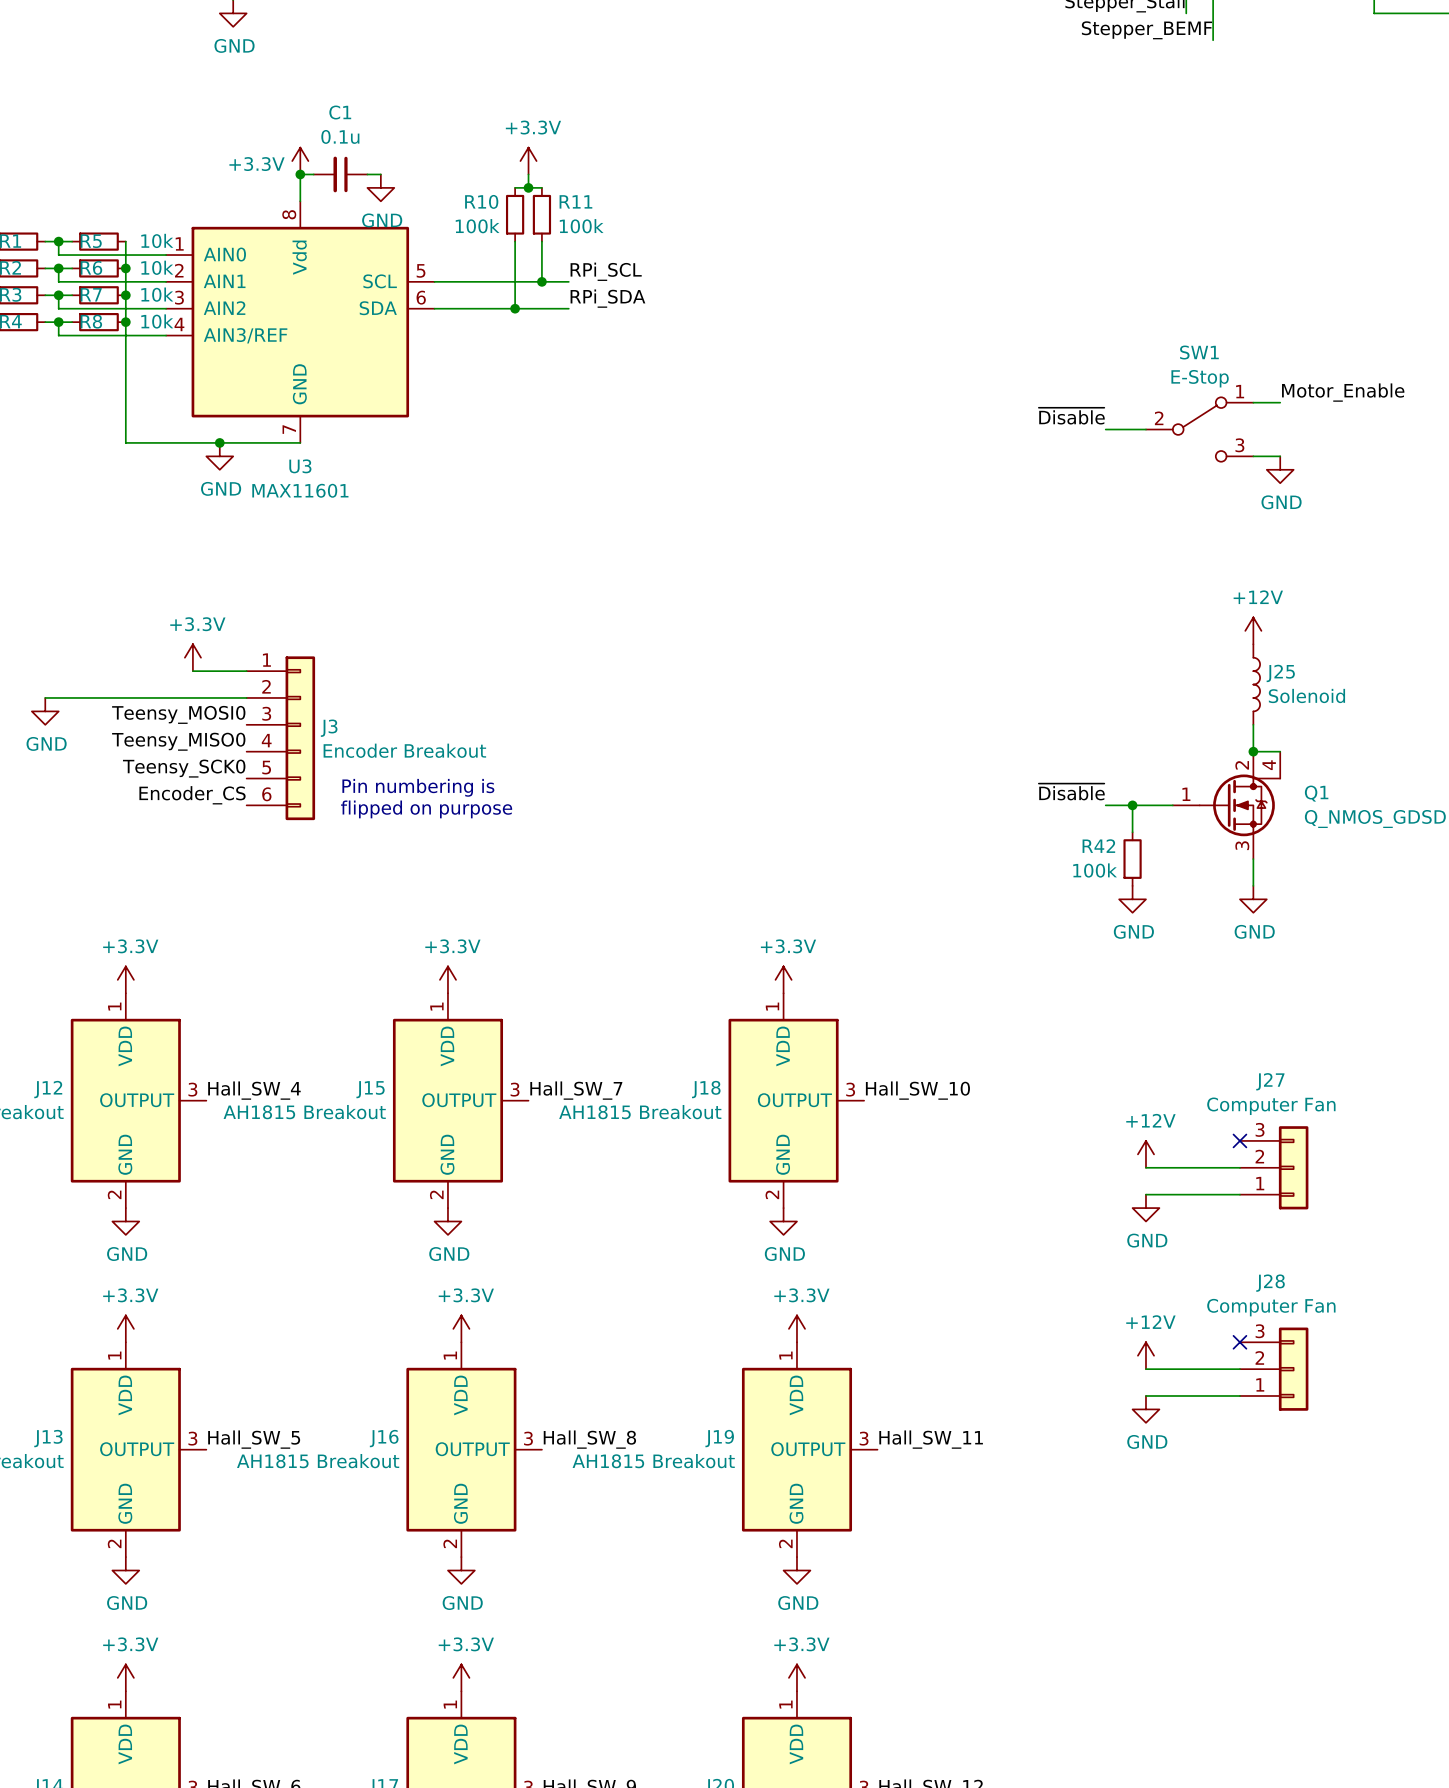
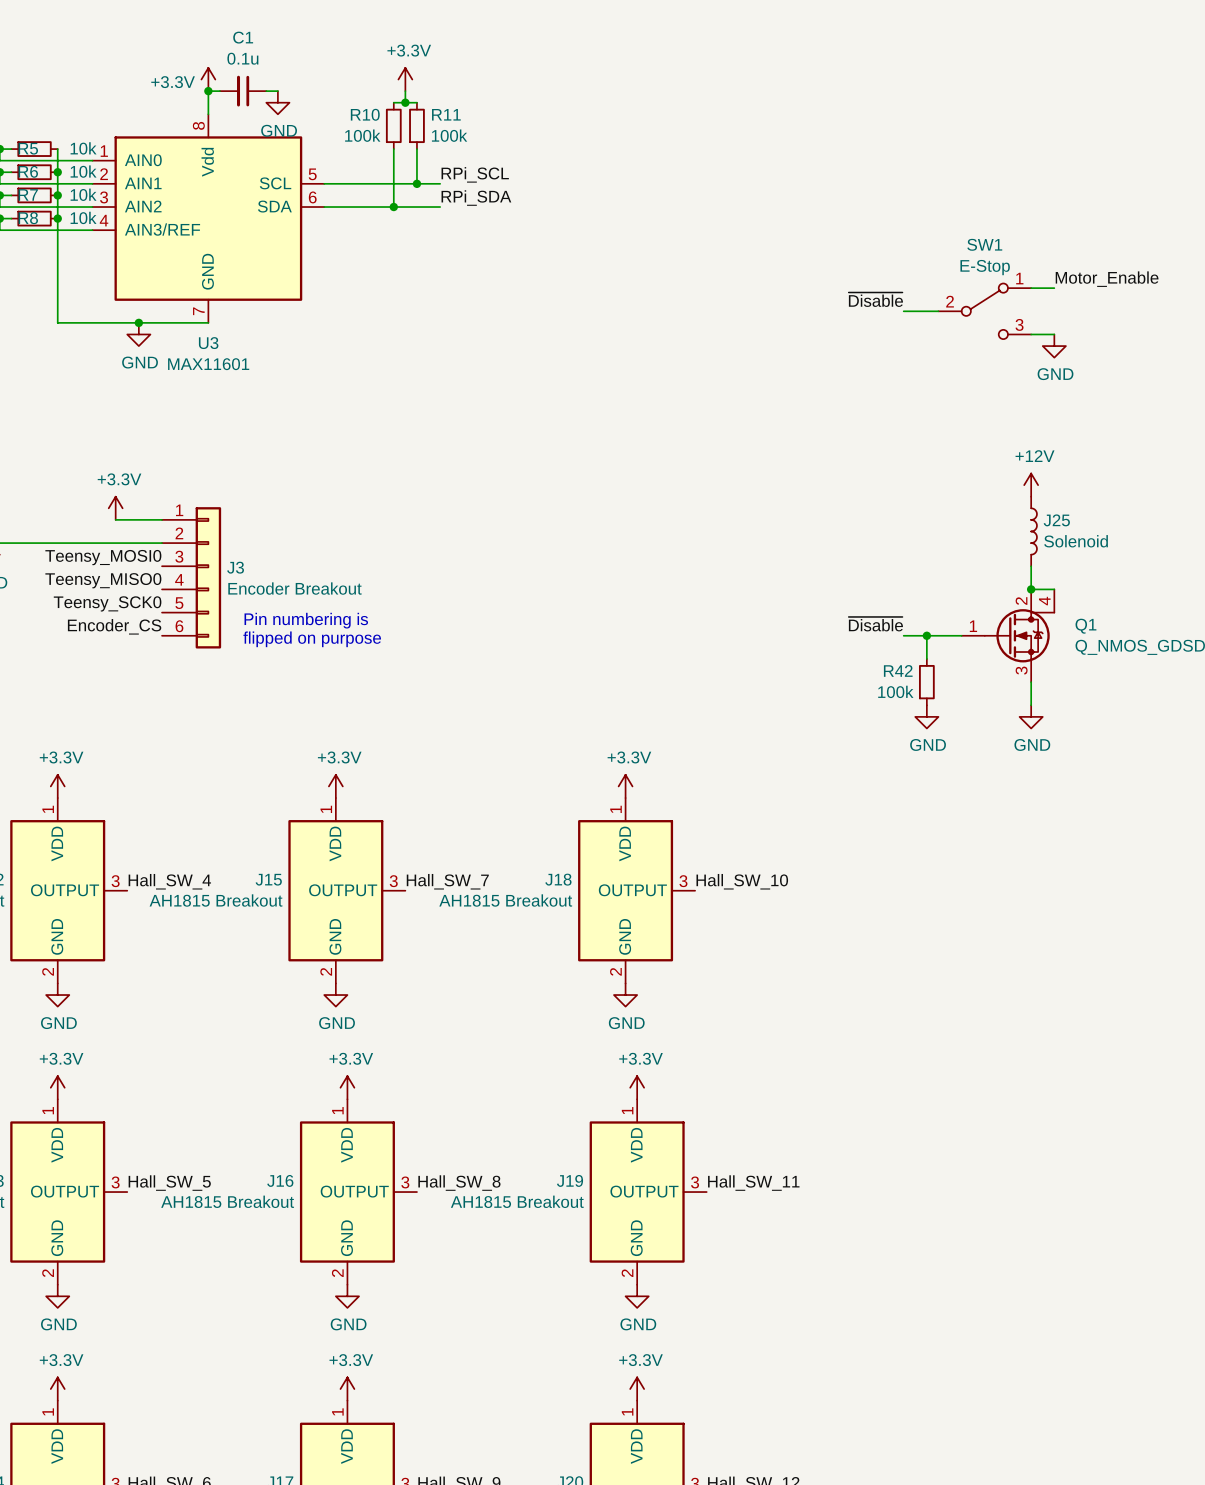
no-connect mark: (1239, 1140) -> none
power symbol: +12V (1145, 1154) -> none
wire: (1145, 1167) (1239, 1167) -> none
J27: Computer Fan (1274, 1167) -> none
wire: (1145, 1194) (1239, 1194) -> none
power symbol: GND (1145, 1208) -> none
no-connect mark: (1239, 1342) -> none
power symbol: +12V (1145, 1355) -> none
wire: (1145, 1369) (1239, 1369) -> none
J28: Computer Fan (1274, 1369) -> none
wire: (1145, 1395) (1239, 1395) -> none
power symbol: GND (1145, 1409) -> none

